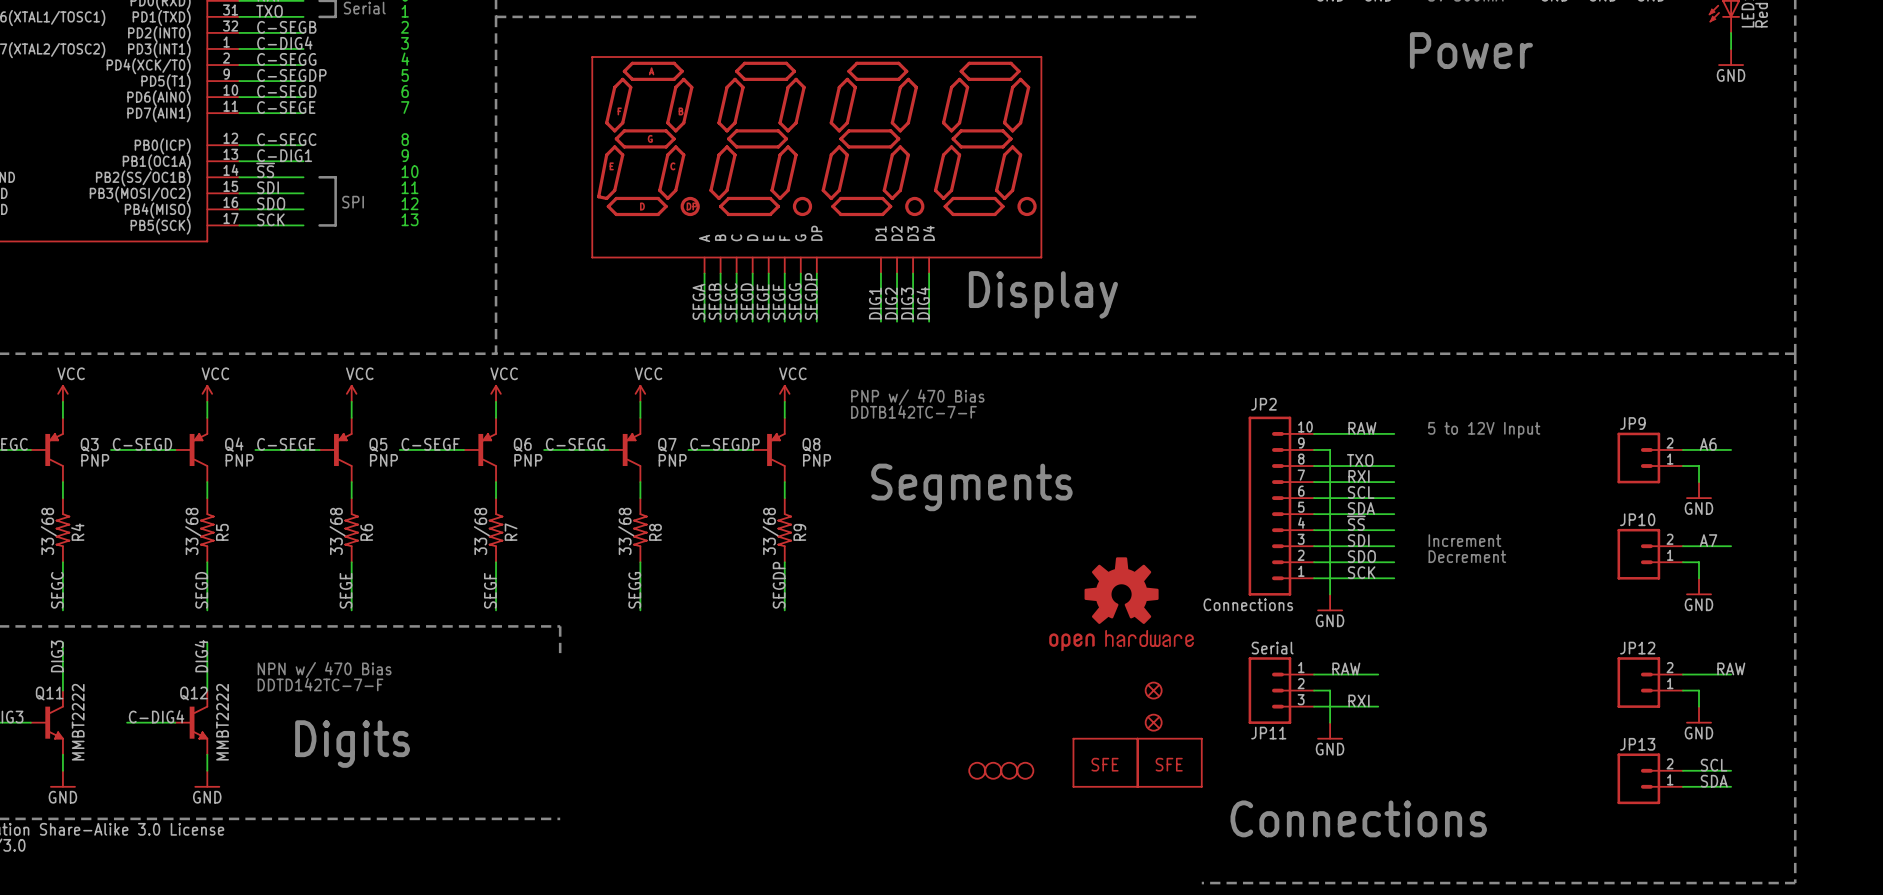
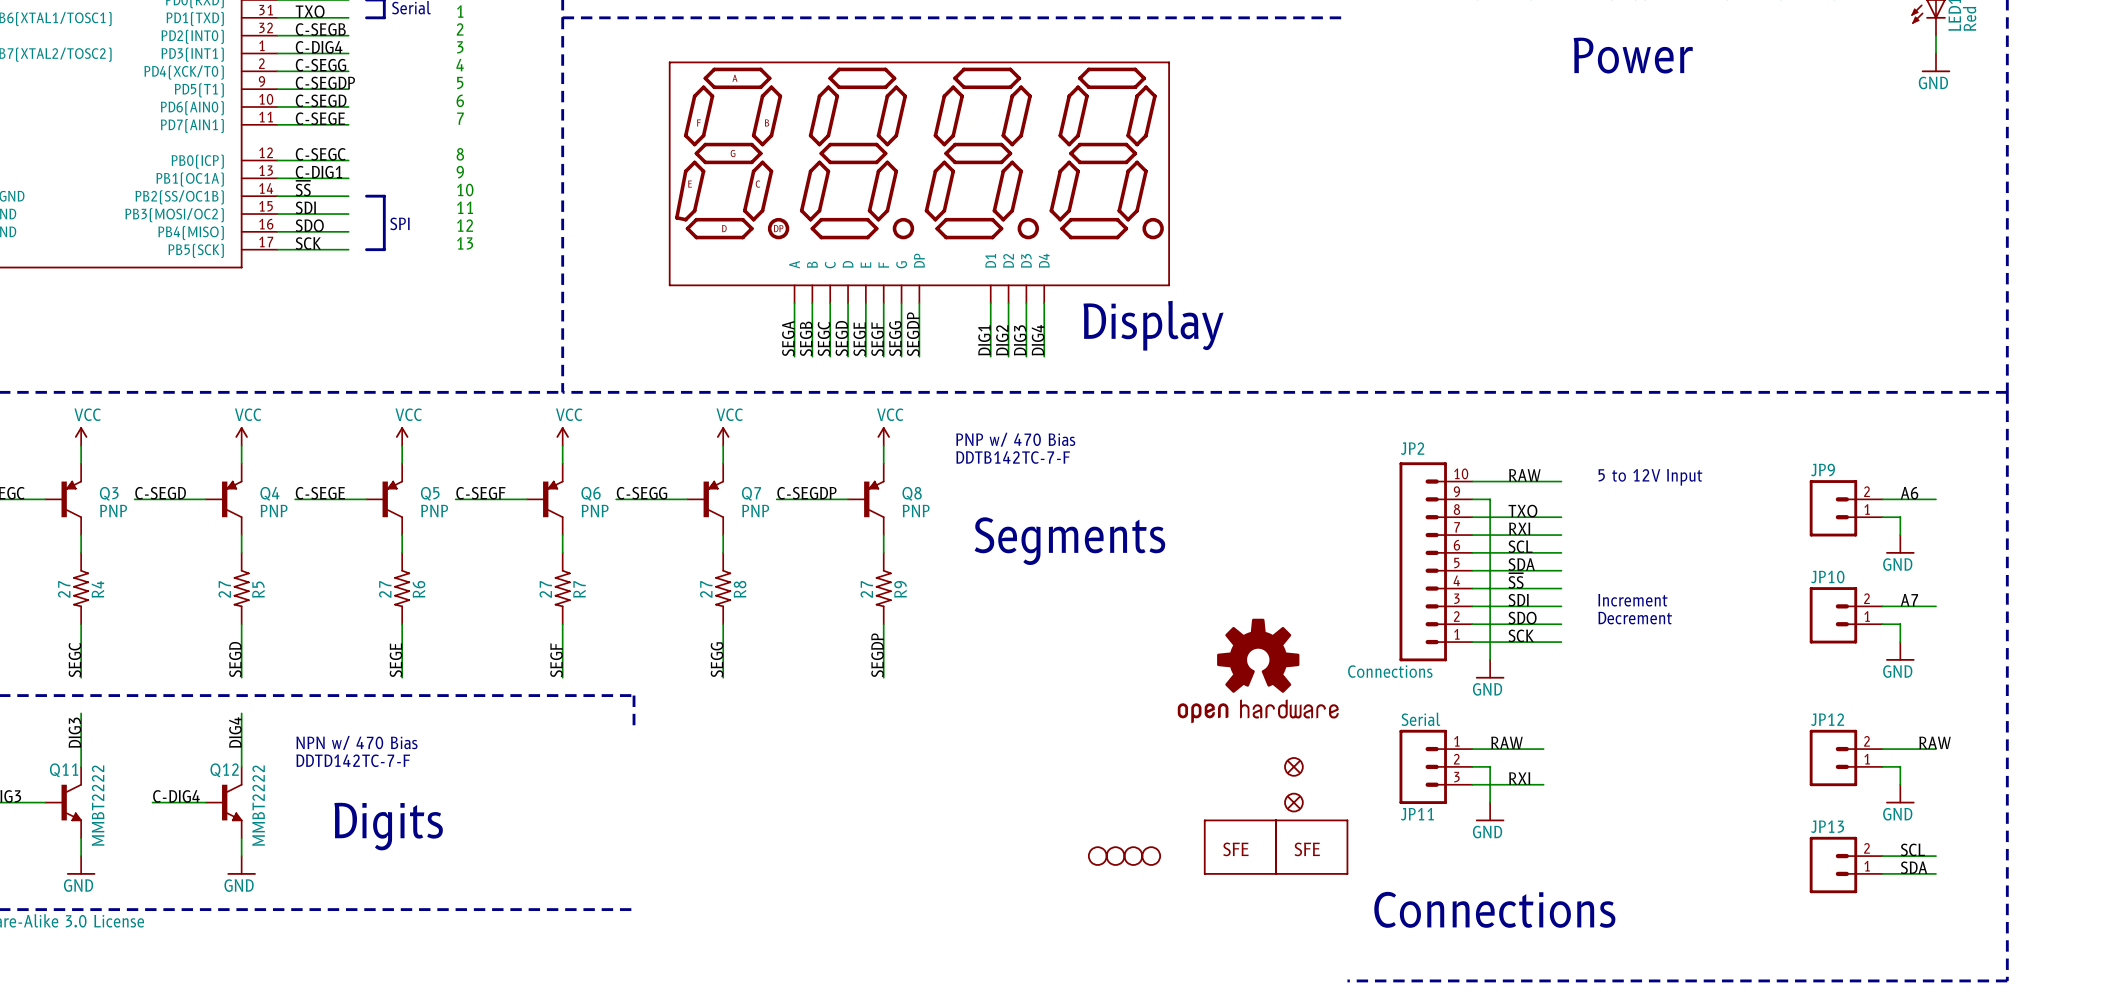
R4 value: 33/68 (48, 531) -> 27 (64, 589)
R5 value: 33/68 (193, 531) -> 27 (224, 589)
R6 value: 33/68 (337, 531) -> 27 (385, 589)
R7 value: 33/68 (481, 531) -> 27 (545, 589)
R8 value: 33/68 (626, 531) -> 27 (706, 589)
R9 value: 33/68 (770, 531) -> 27 (866, 589)

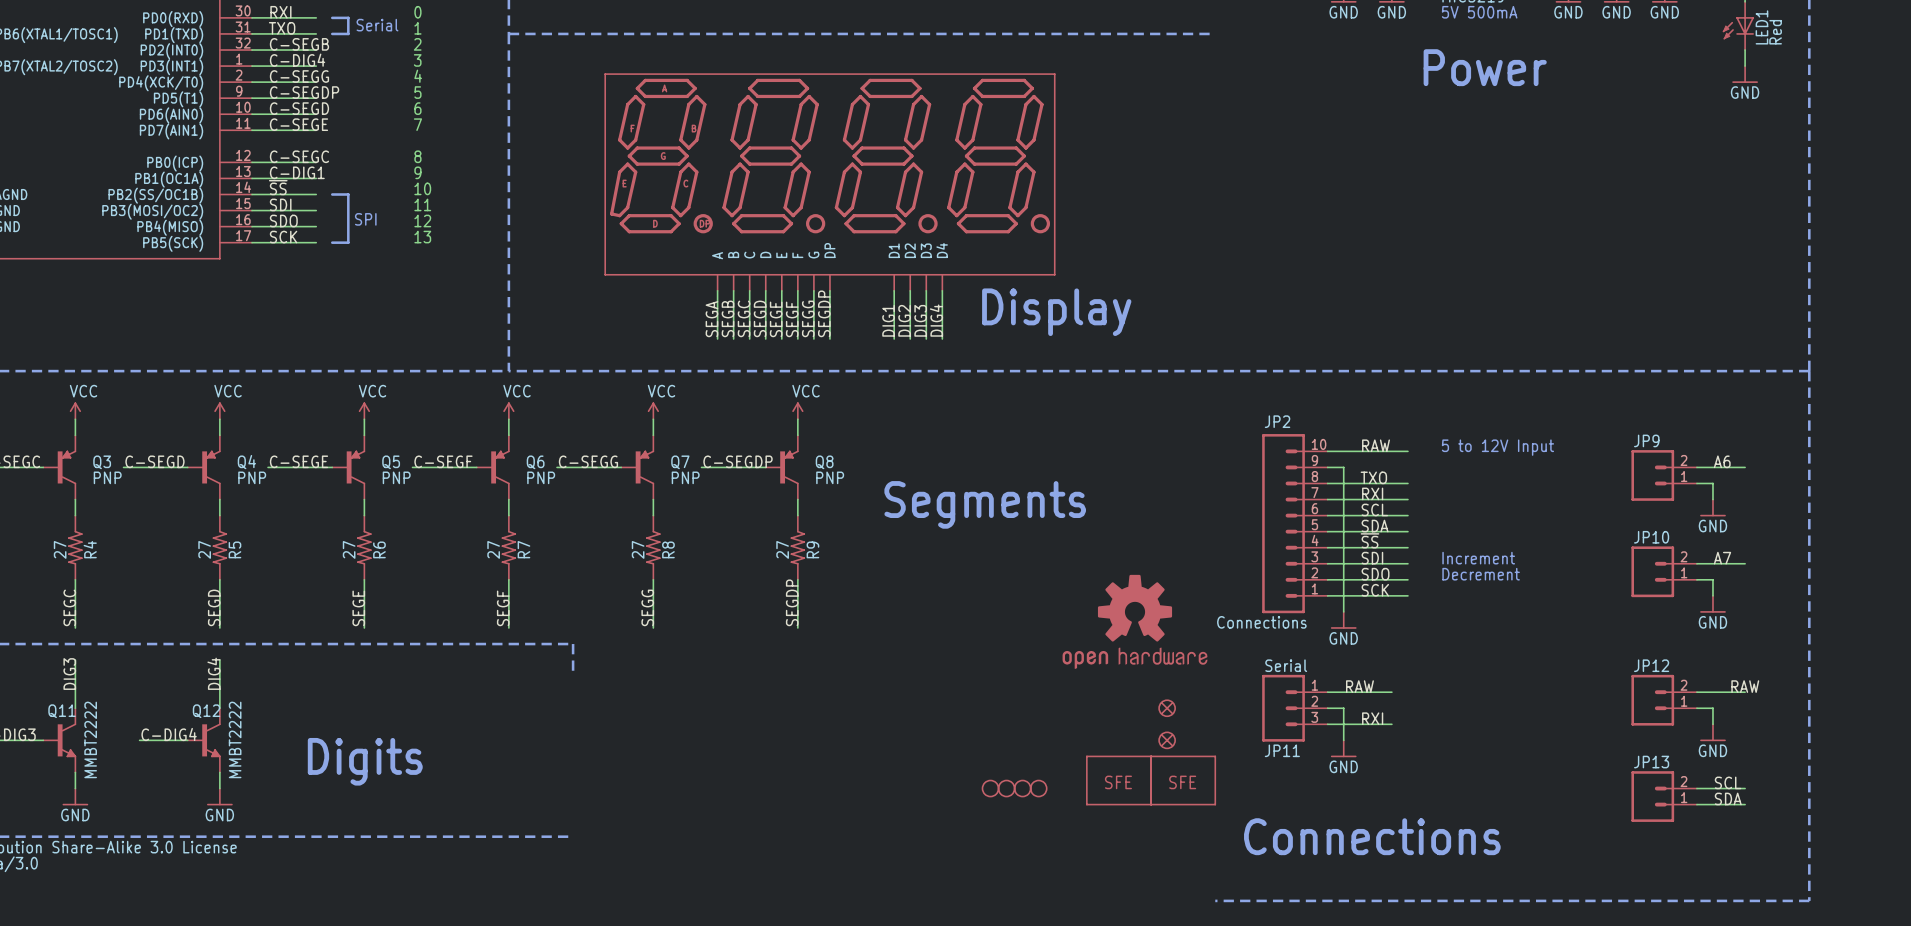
text: PNP w/ 470 Bias (1015, 439) -> none
text: DDTB142TC-7-F (1013, 457) -> none
text: NPN w/ 470 Bias (356, 742) -> none
text: DDTD142TC-7-F (353, 760) -> none

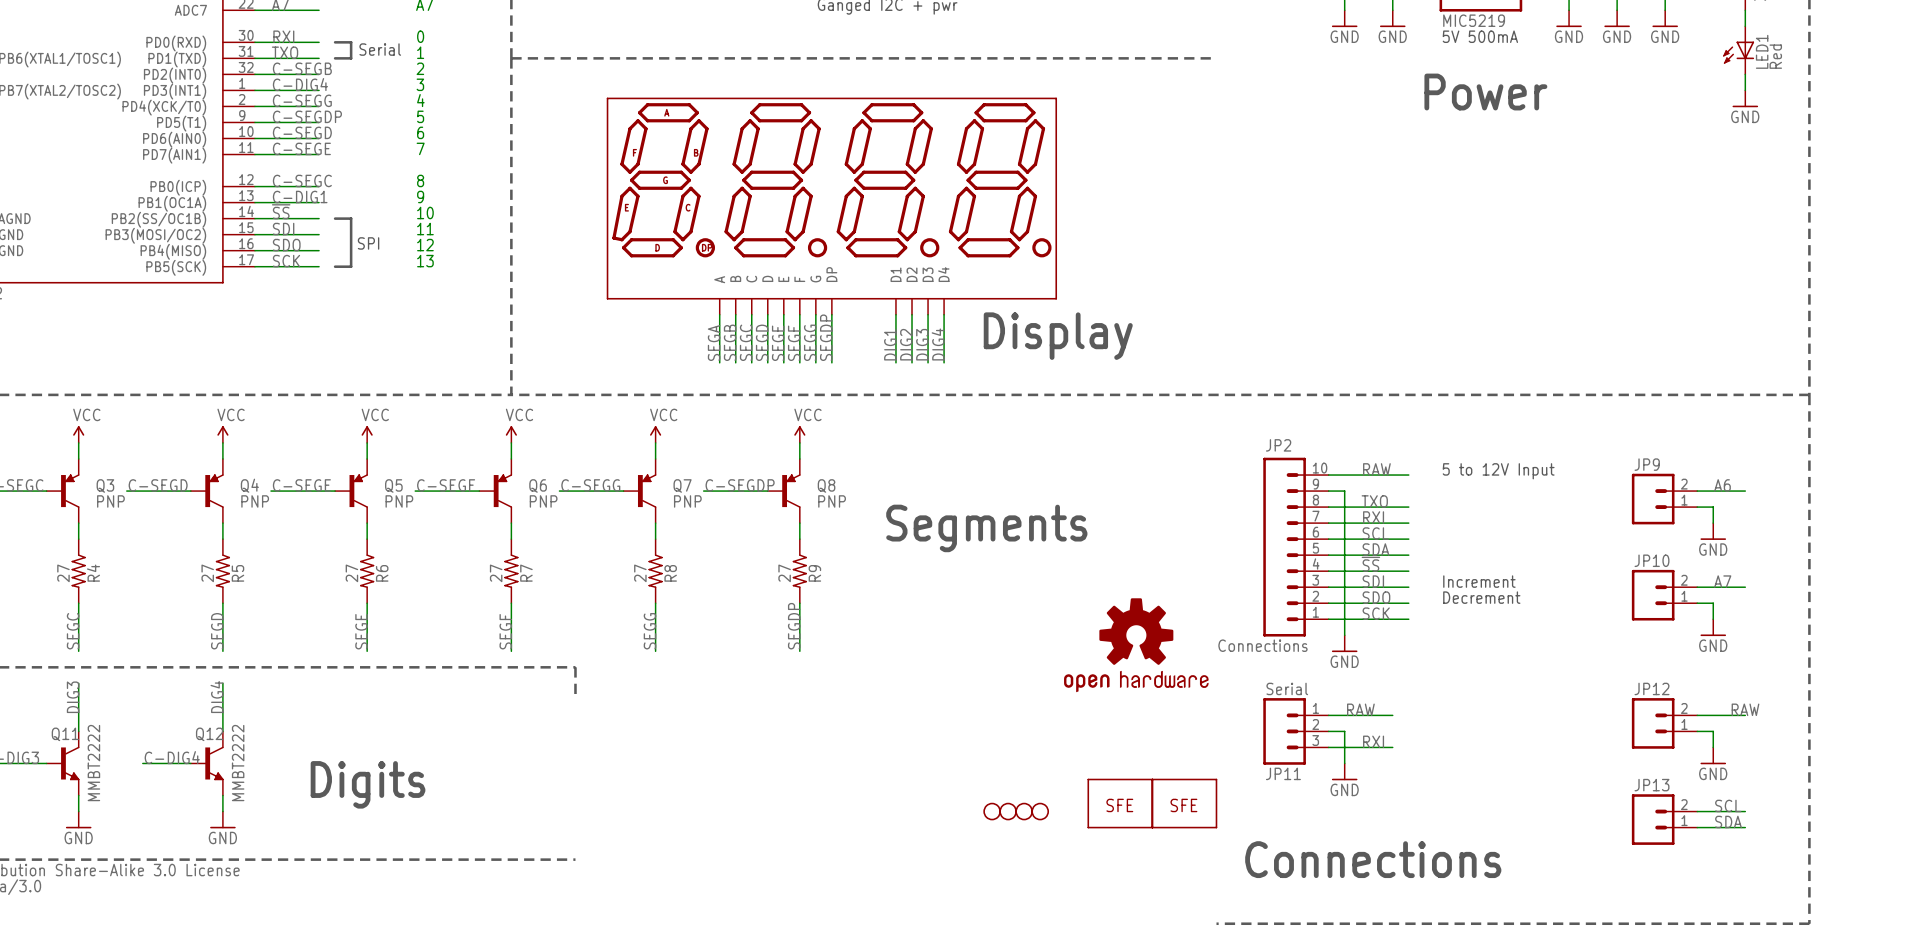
part: (1167, 708) -> none
part: (1167, 740) -> none

